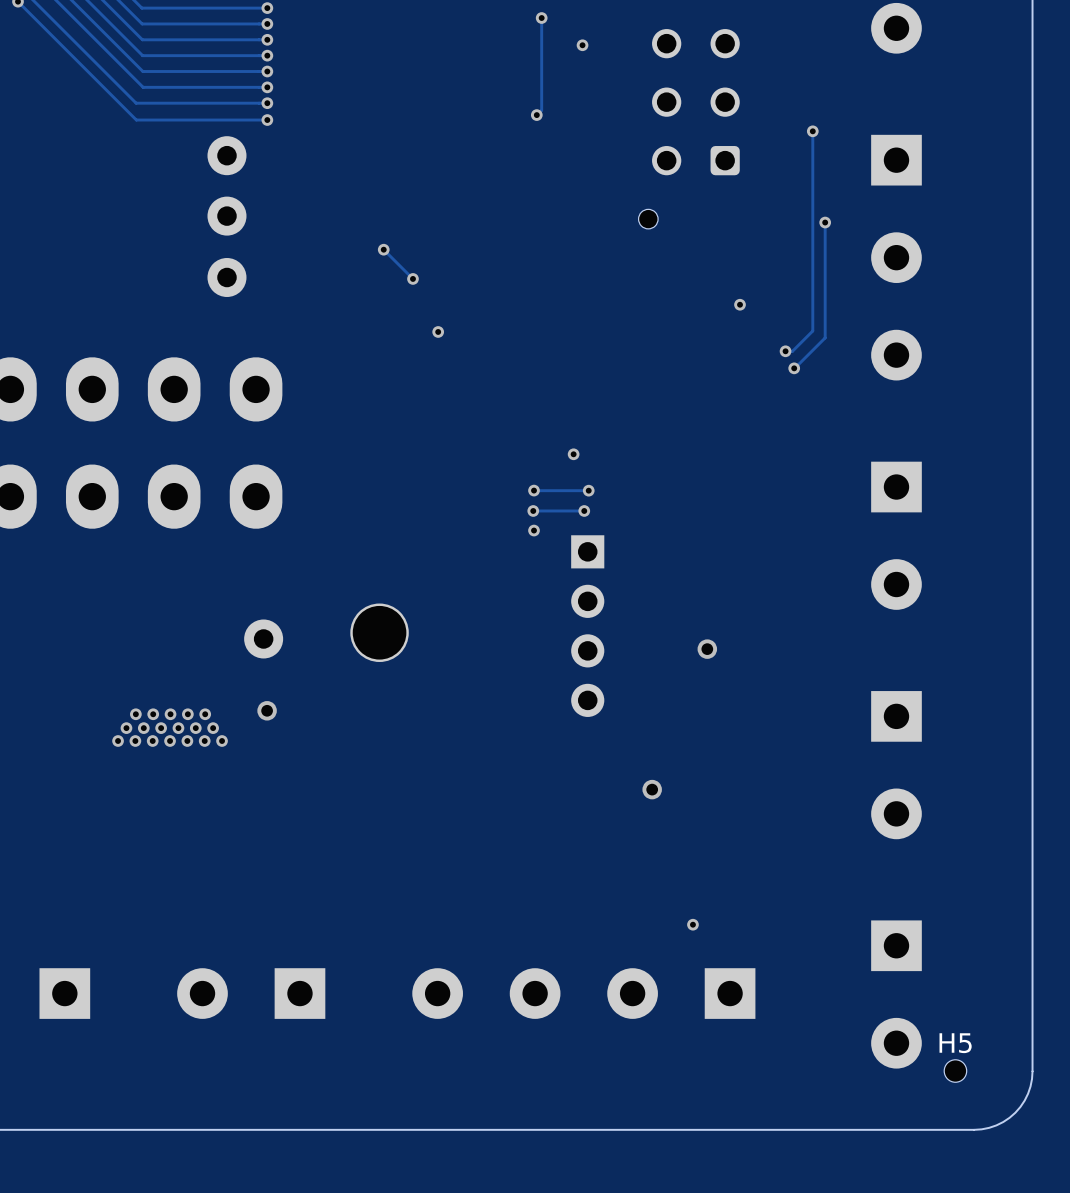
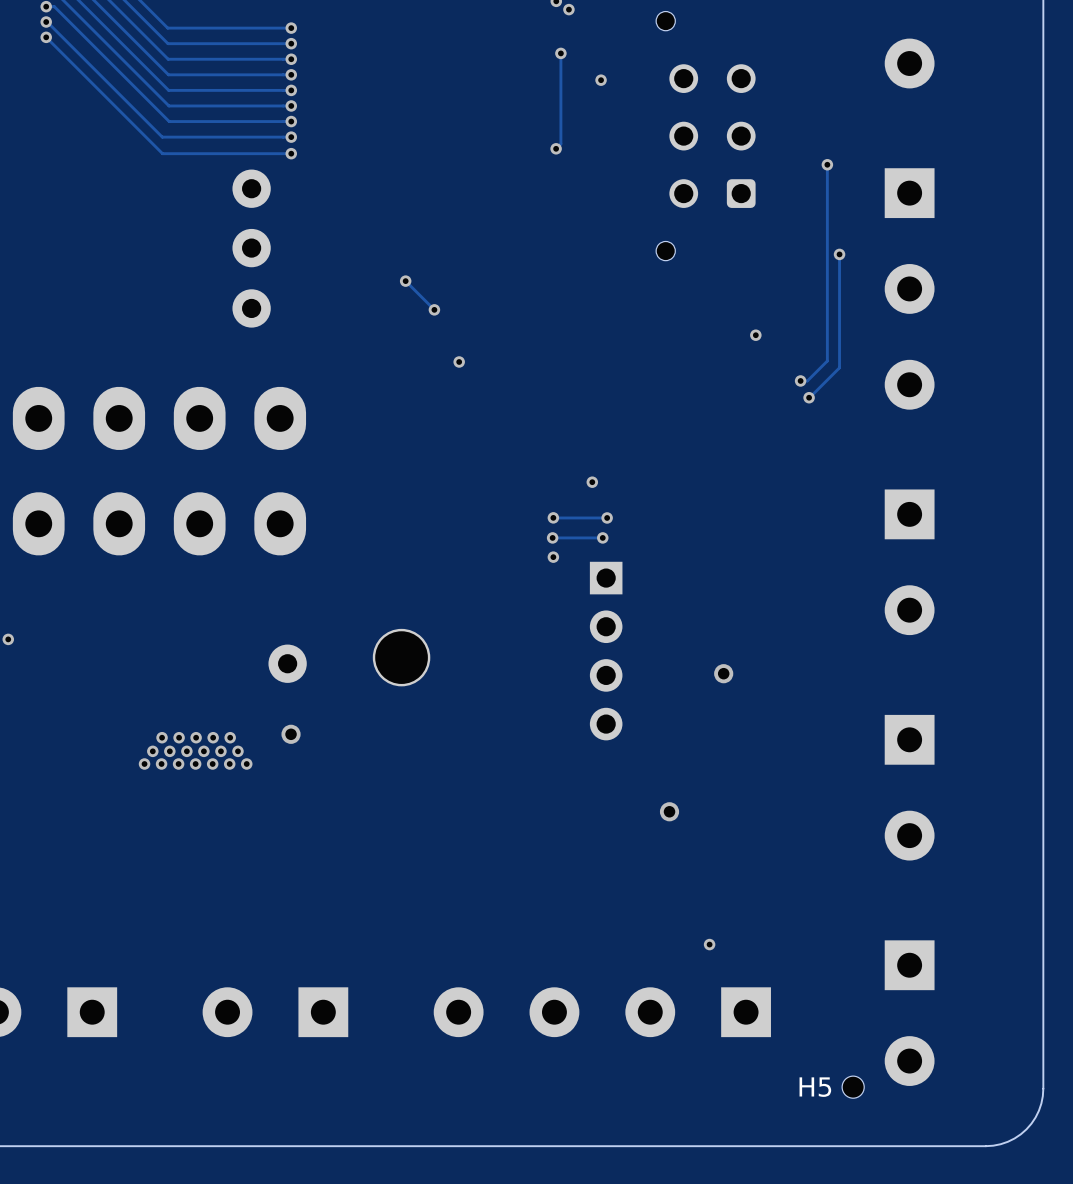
H5 name position: H5 (955, 1043) -> H5 (815, 1087)
H5 position: (955, 1071) -> (853, 1087)

